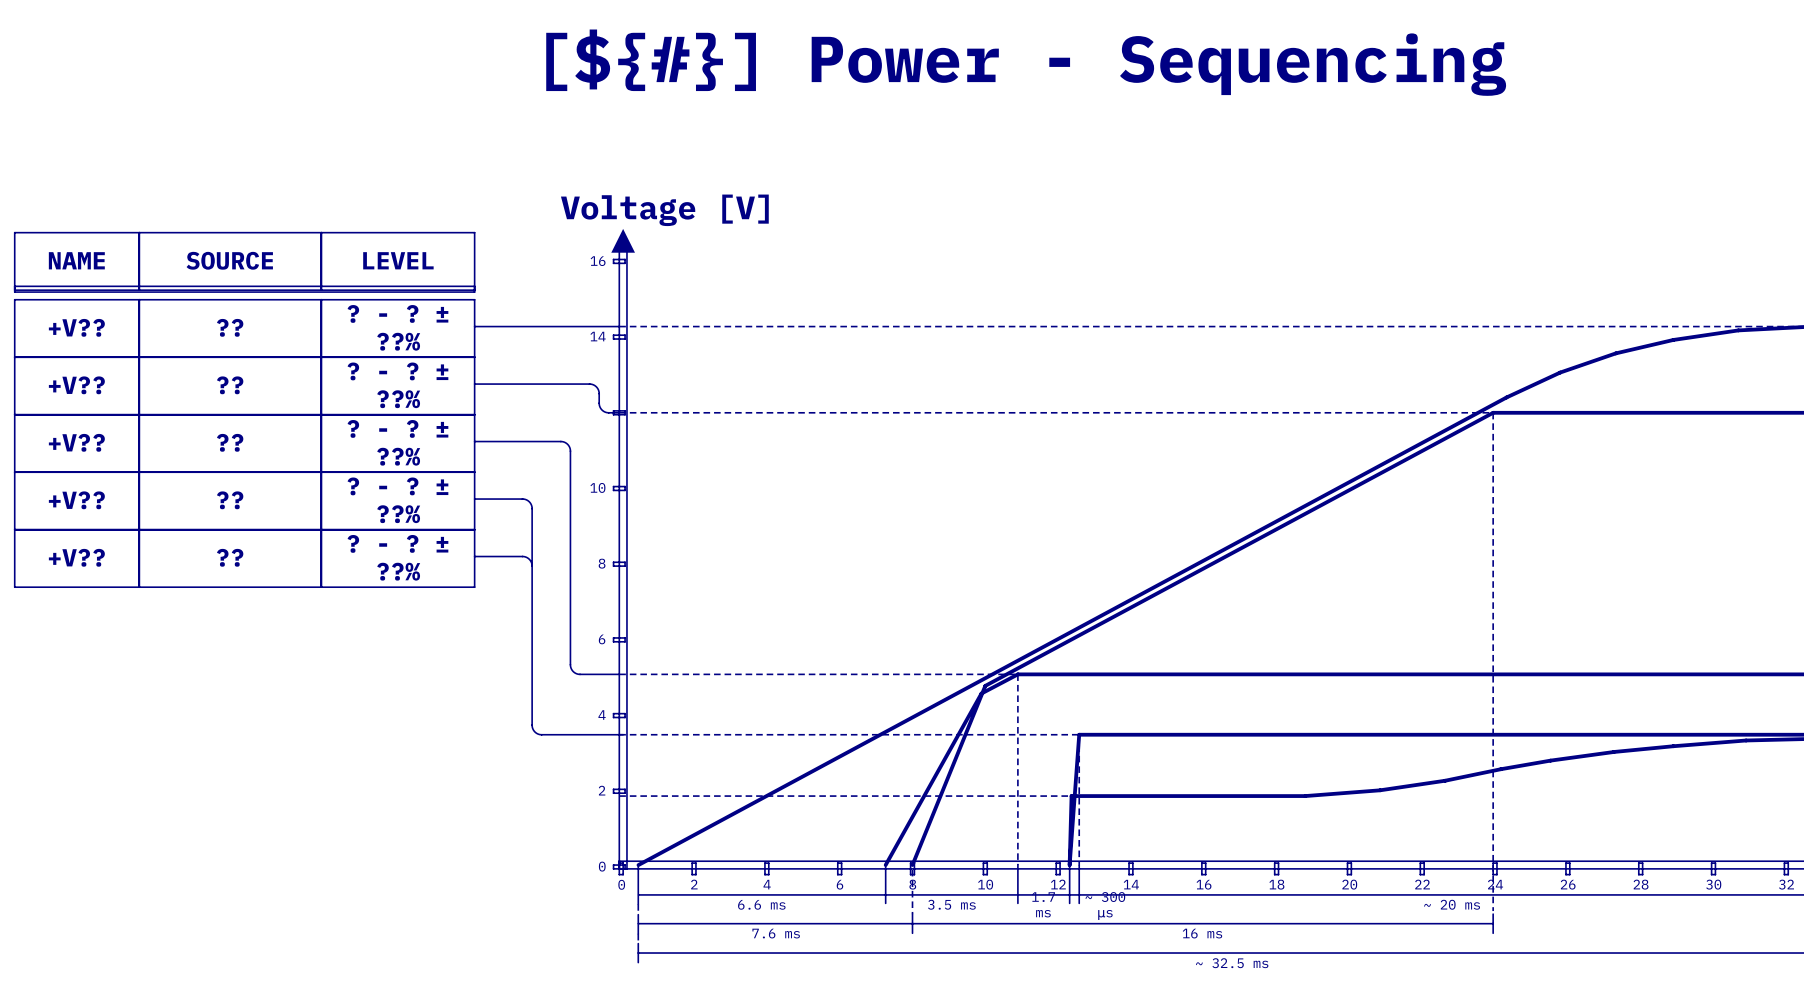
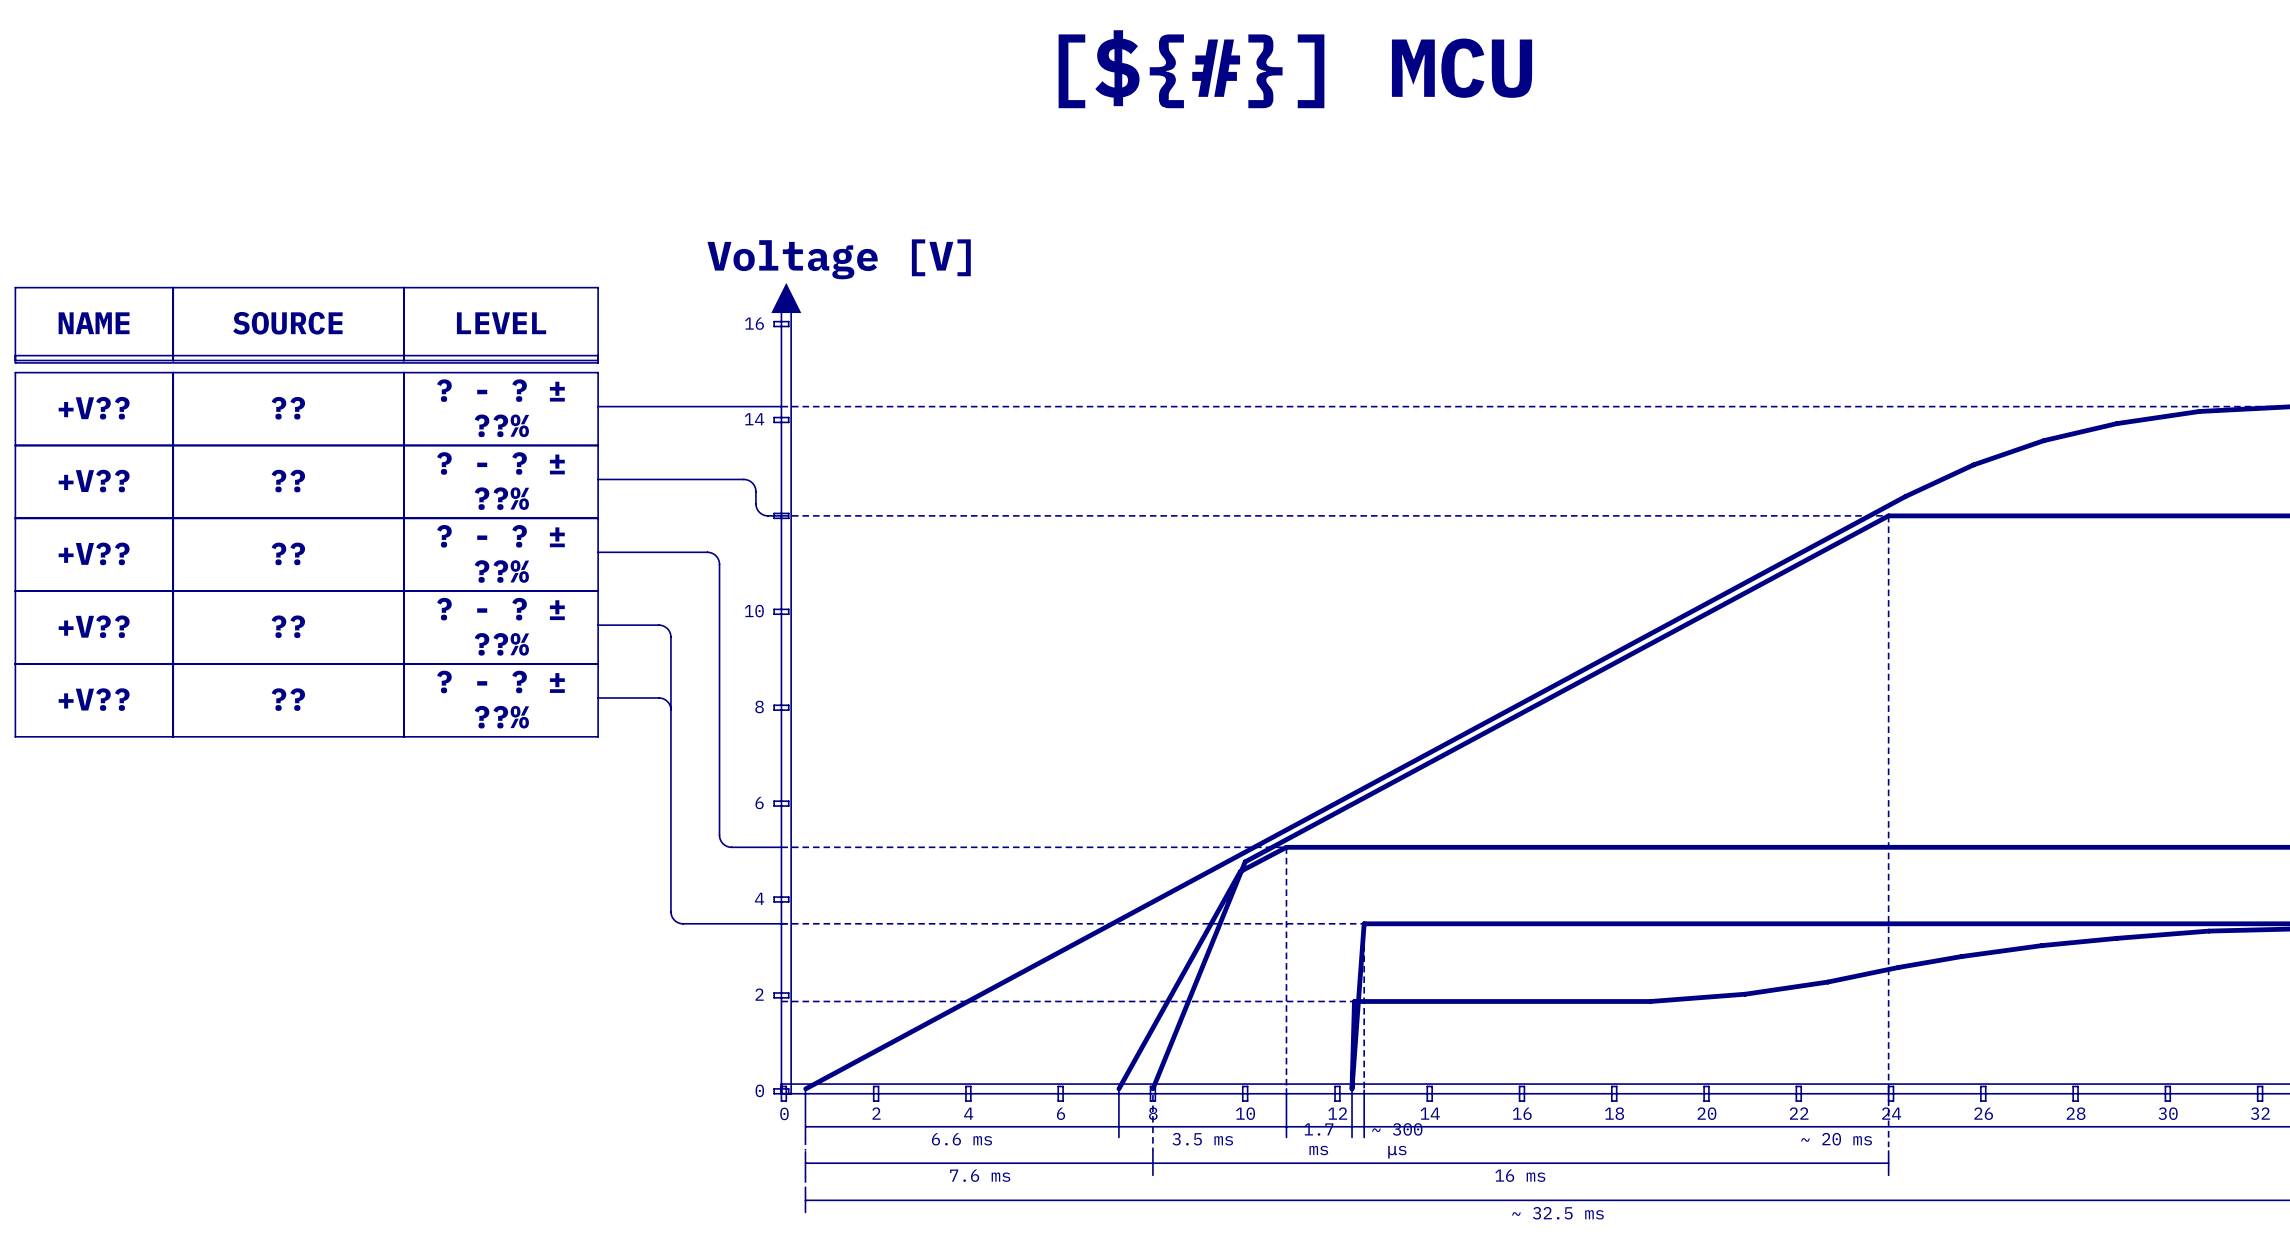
text: [${#}] Power - Sequencing (1026, 62) -> [${#}] MCU (1295, 69)

